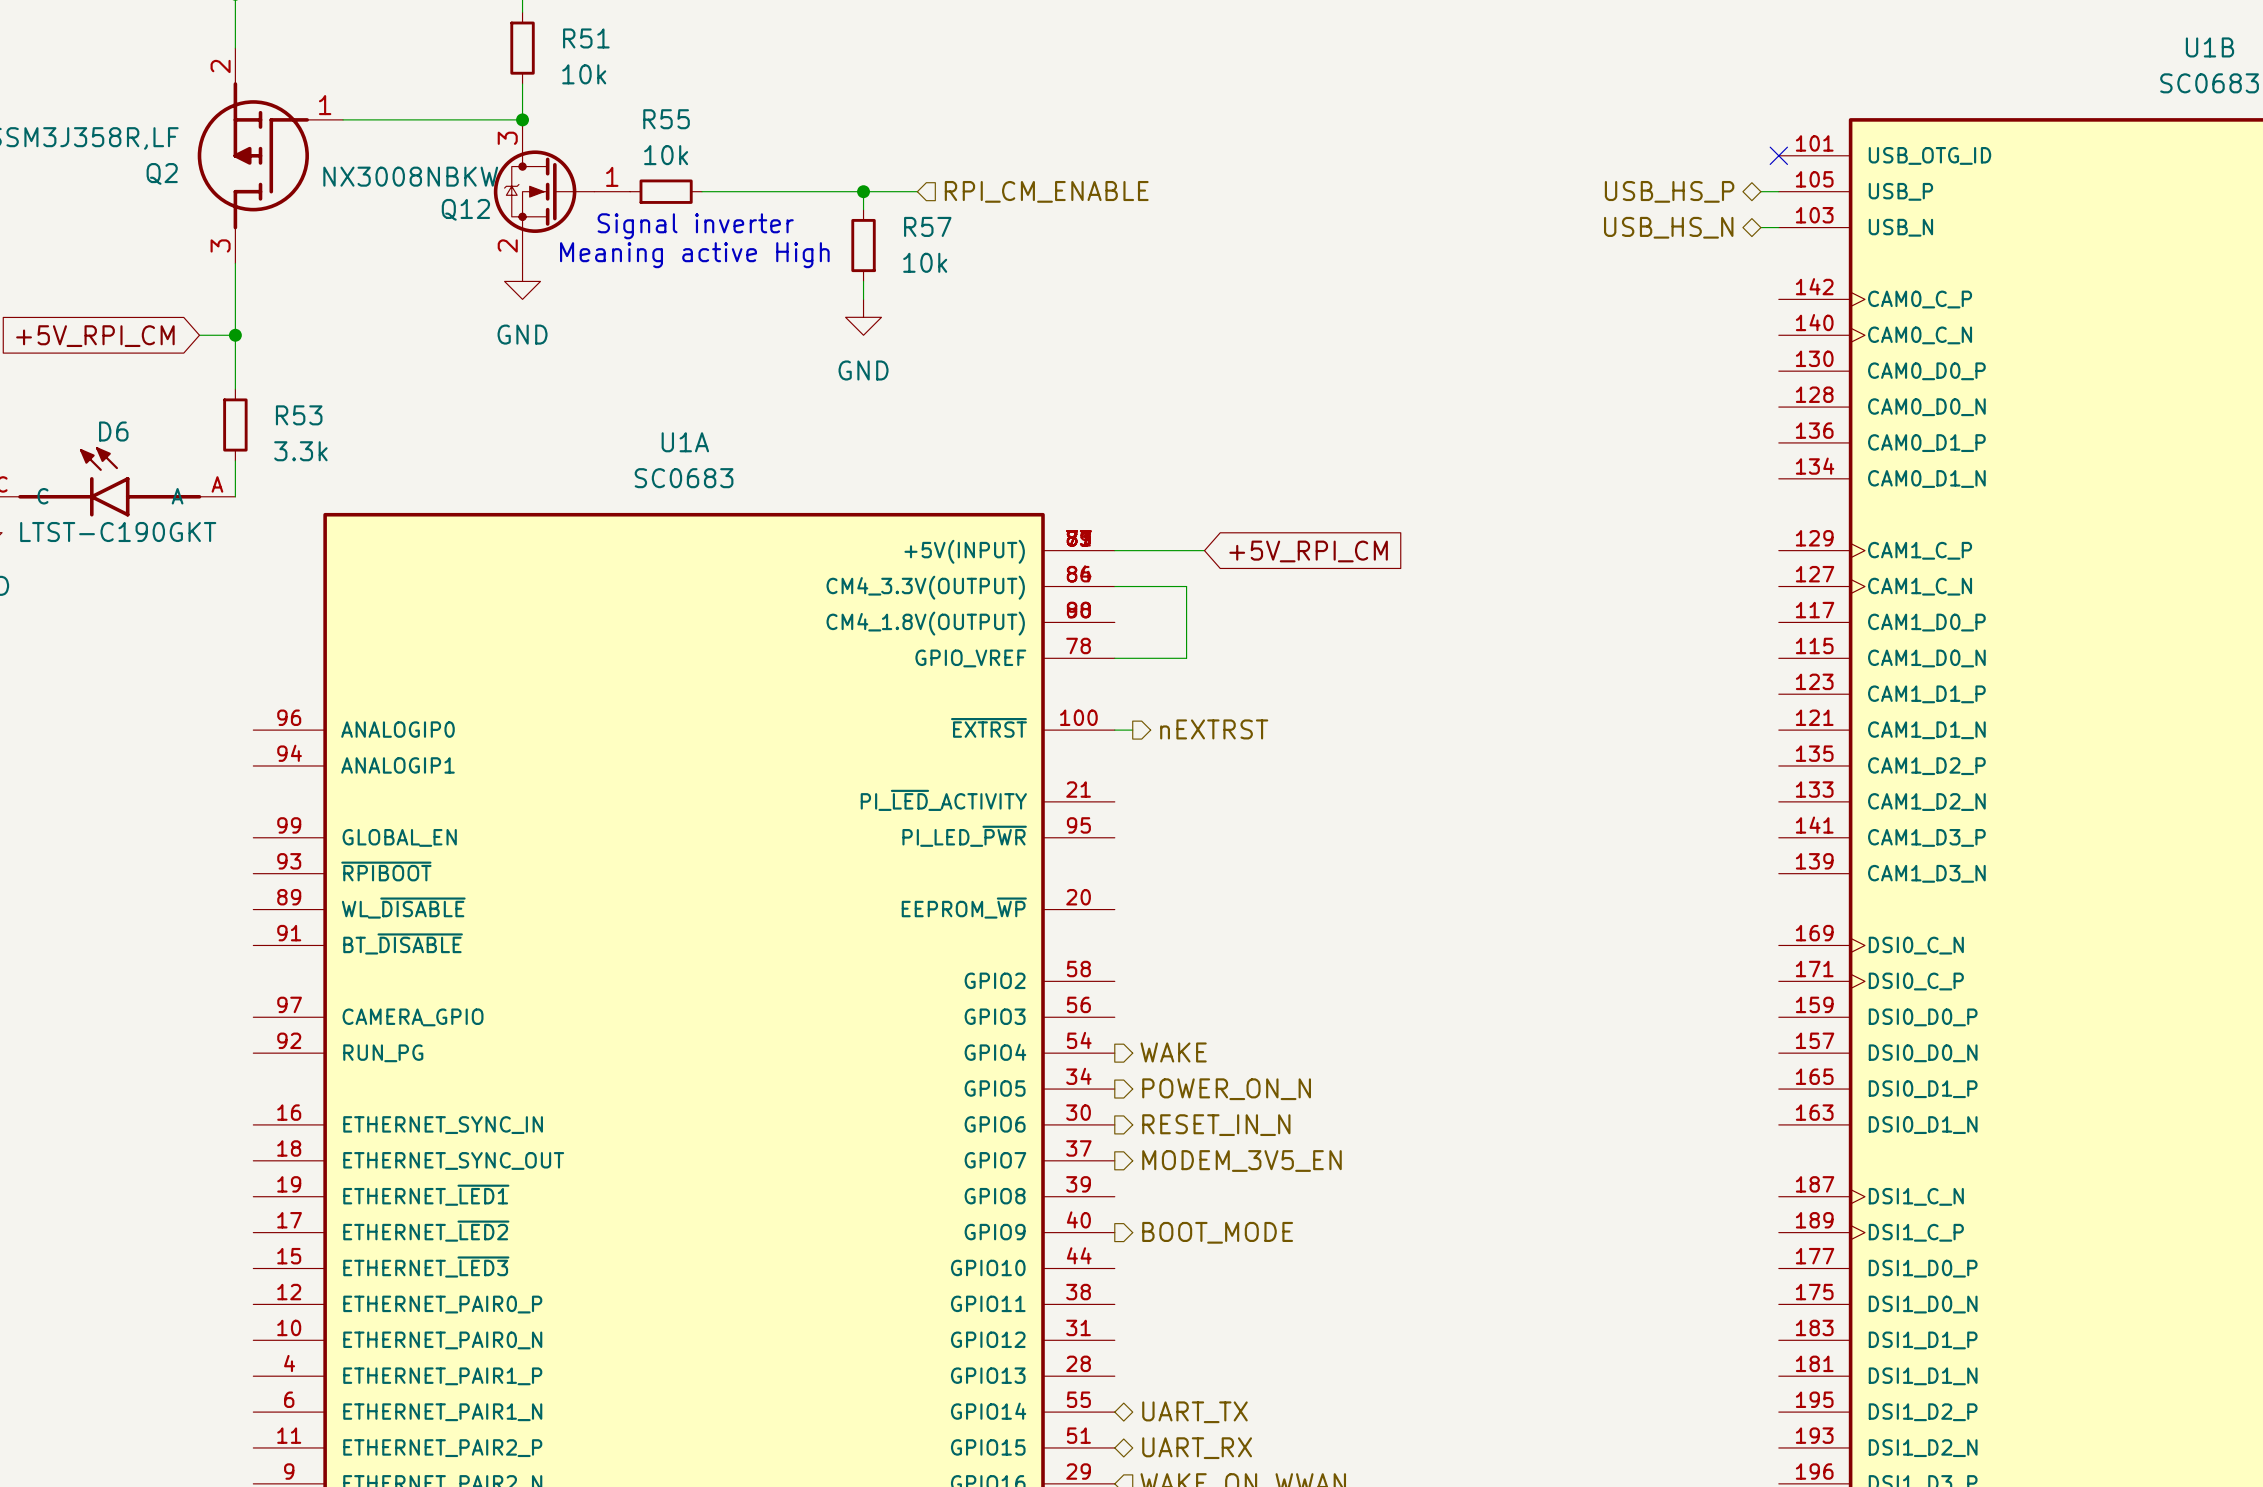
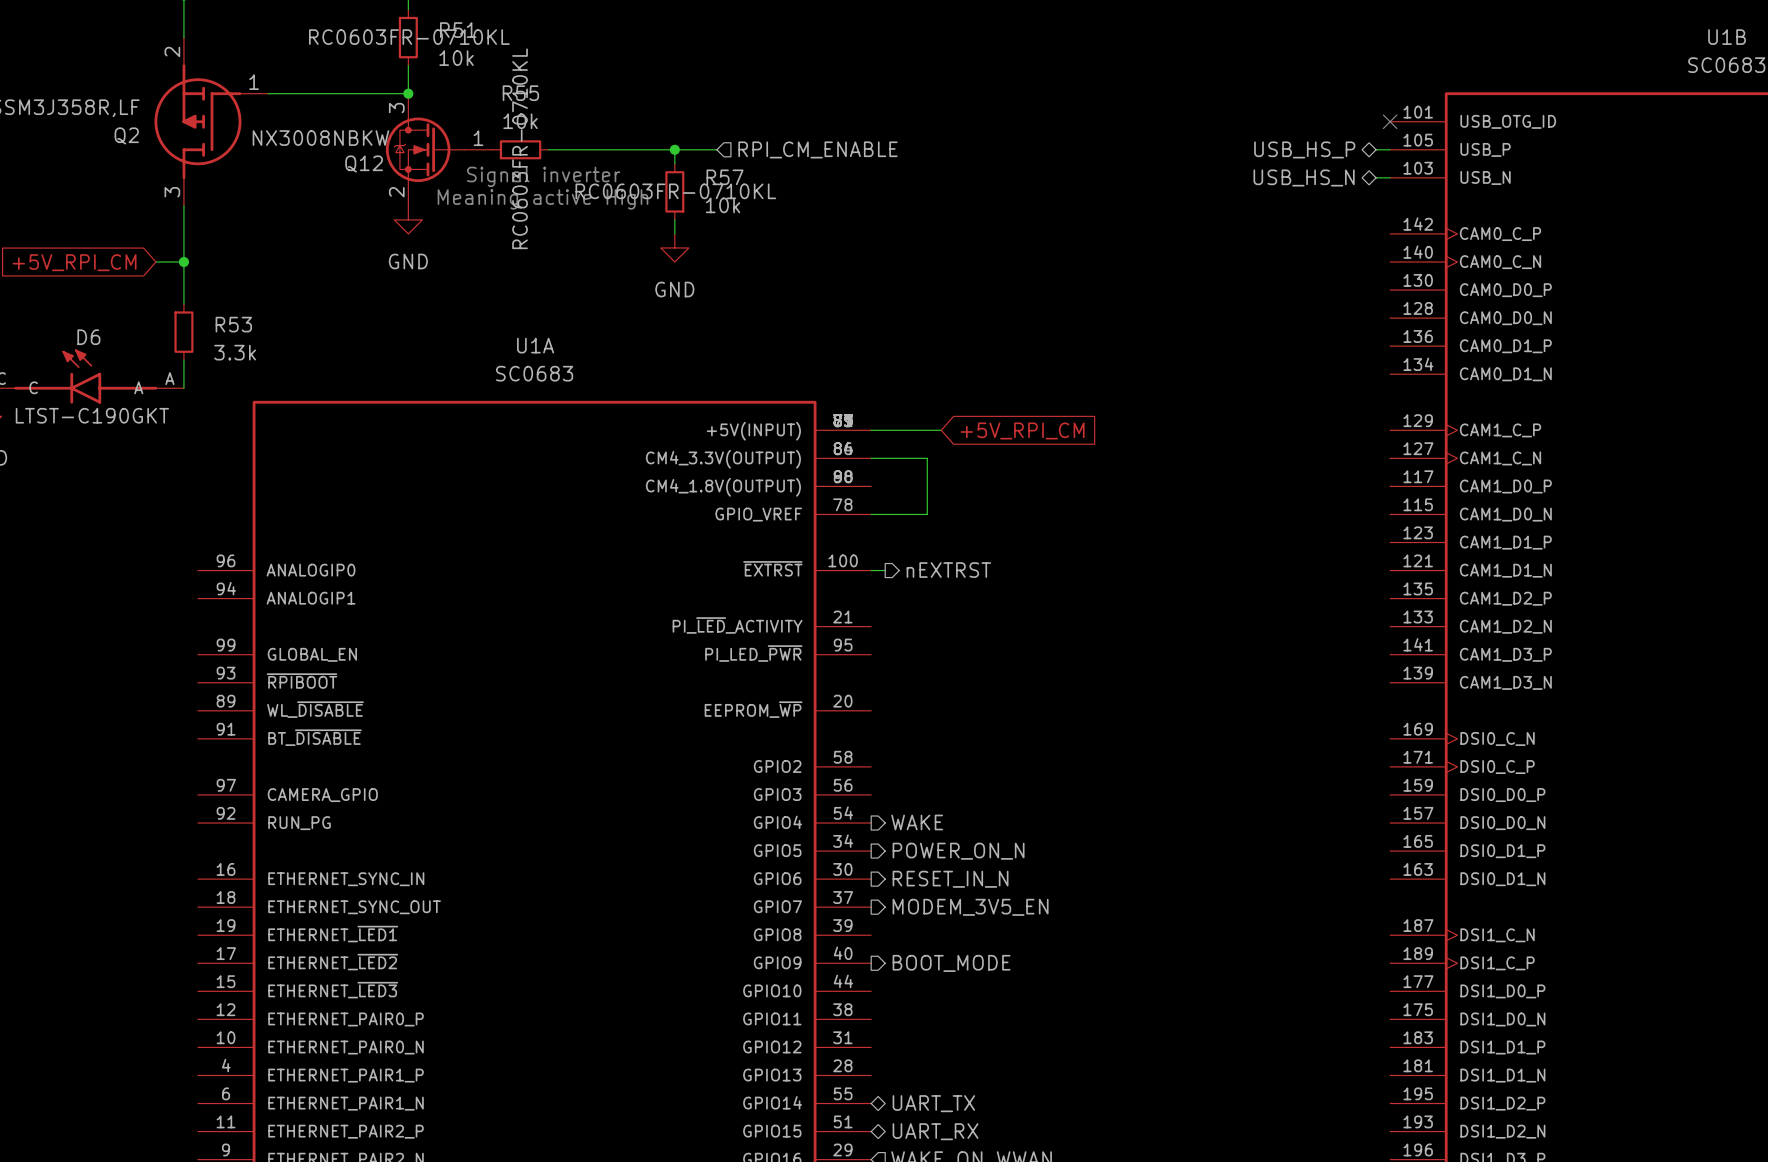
R51 text: none -> RC0603FR-0710KL (409, 37)
R55 text: none -> RC0603FR-0710KL (520, 148)
R57 text: none -> RC0603FR-0710KL (675, 191)

